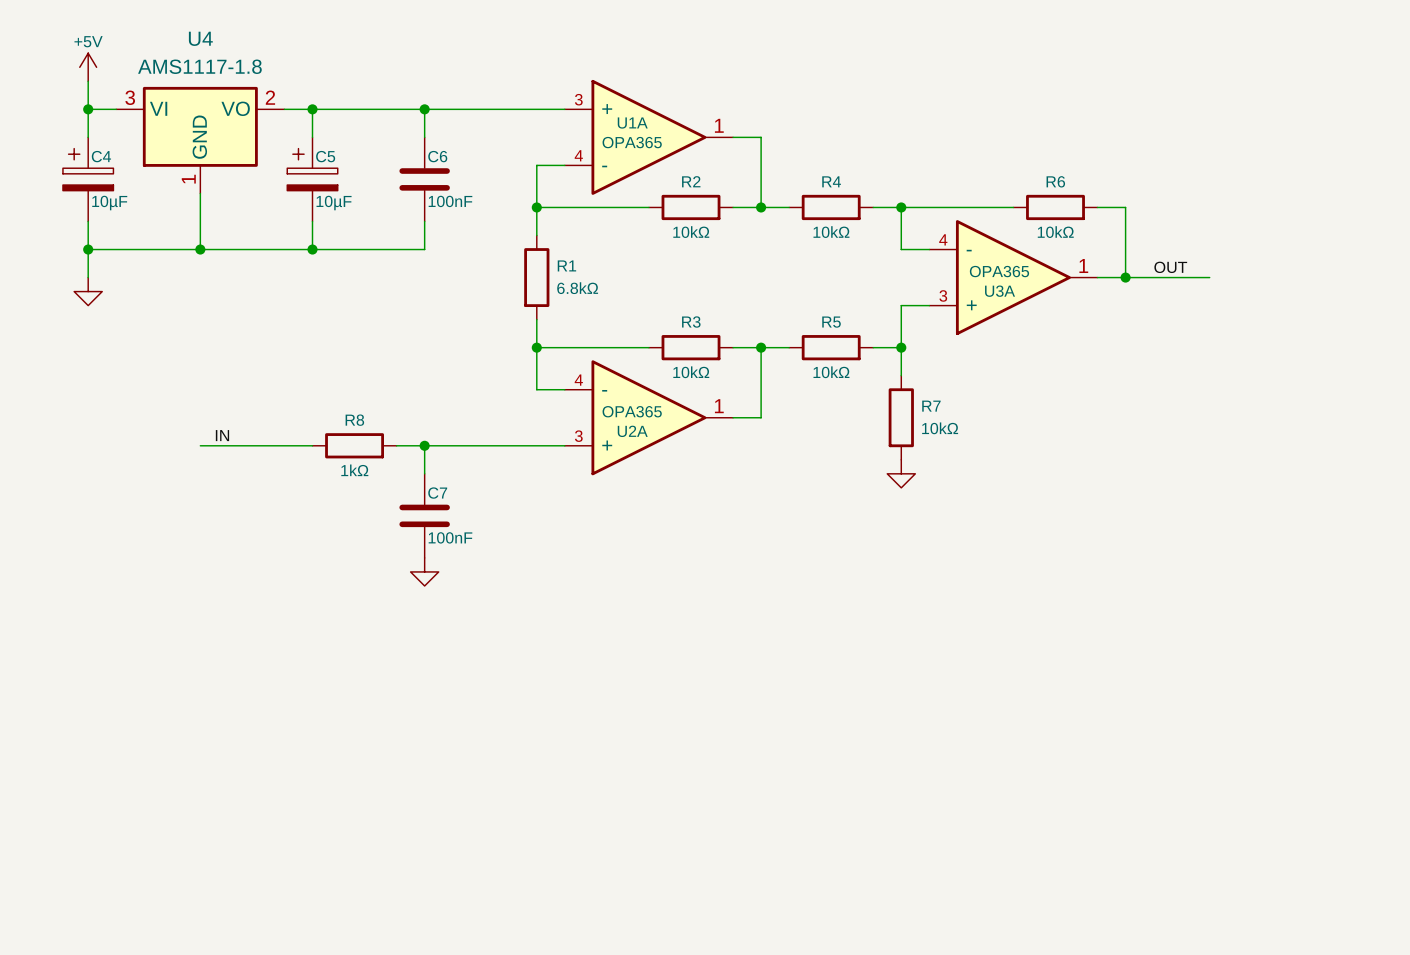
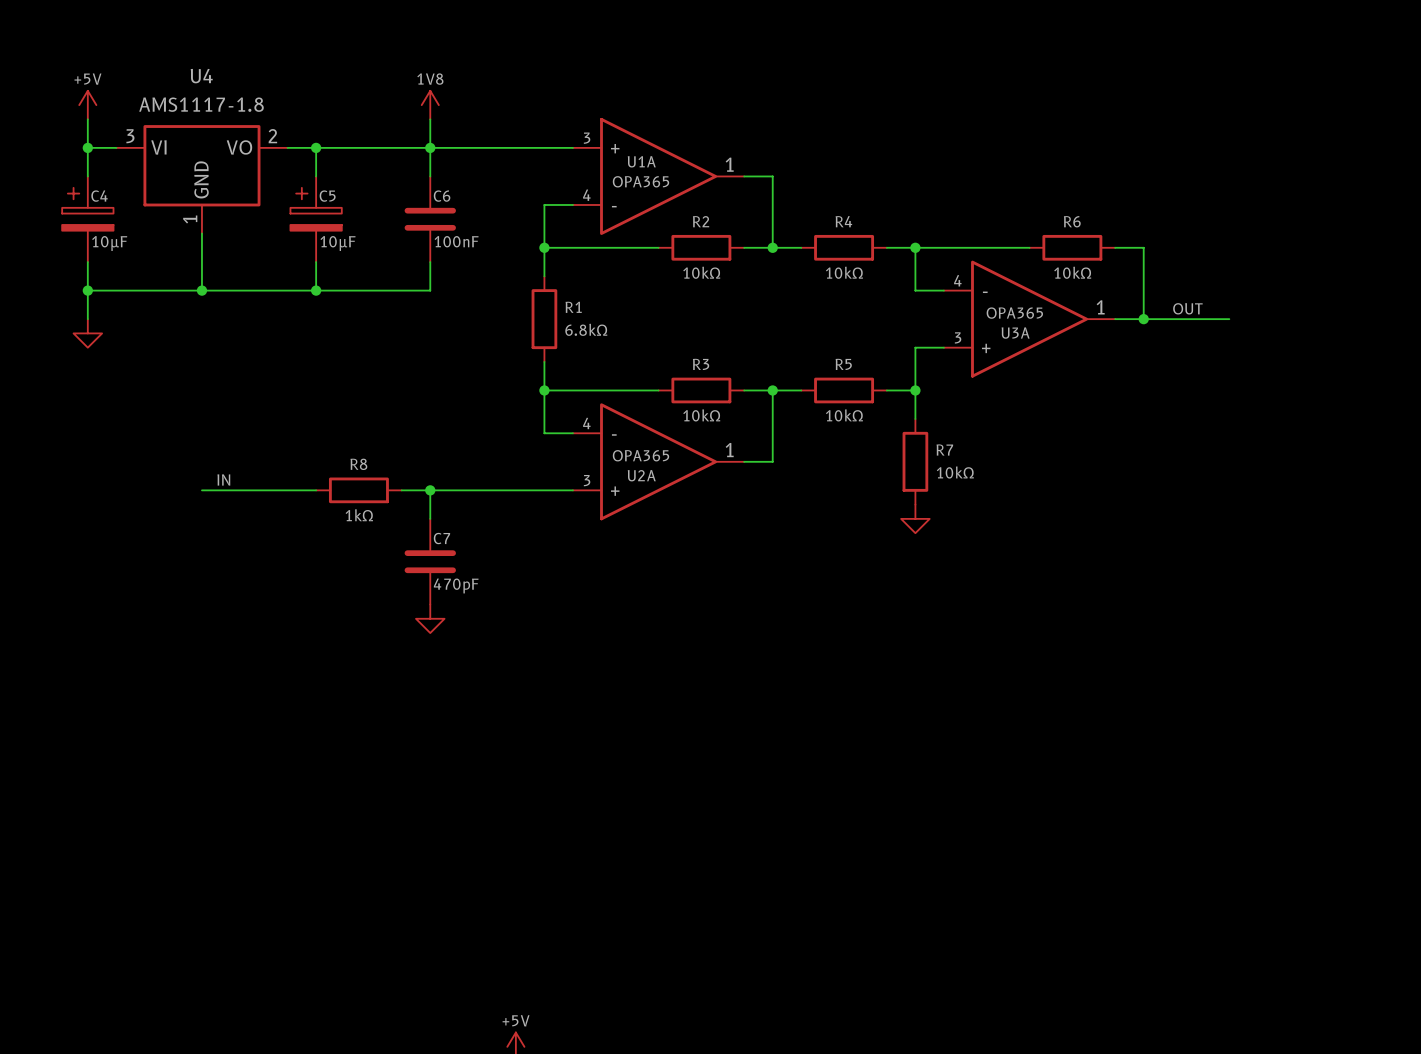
power symbol: none -> 1V8 (430, 105)
wire: none -> (430, 119) (430, 147)
C7 value: 100nF (450, 537) -> 470pF (456, 585)

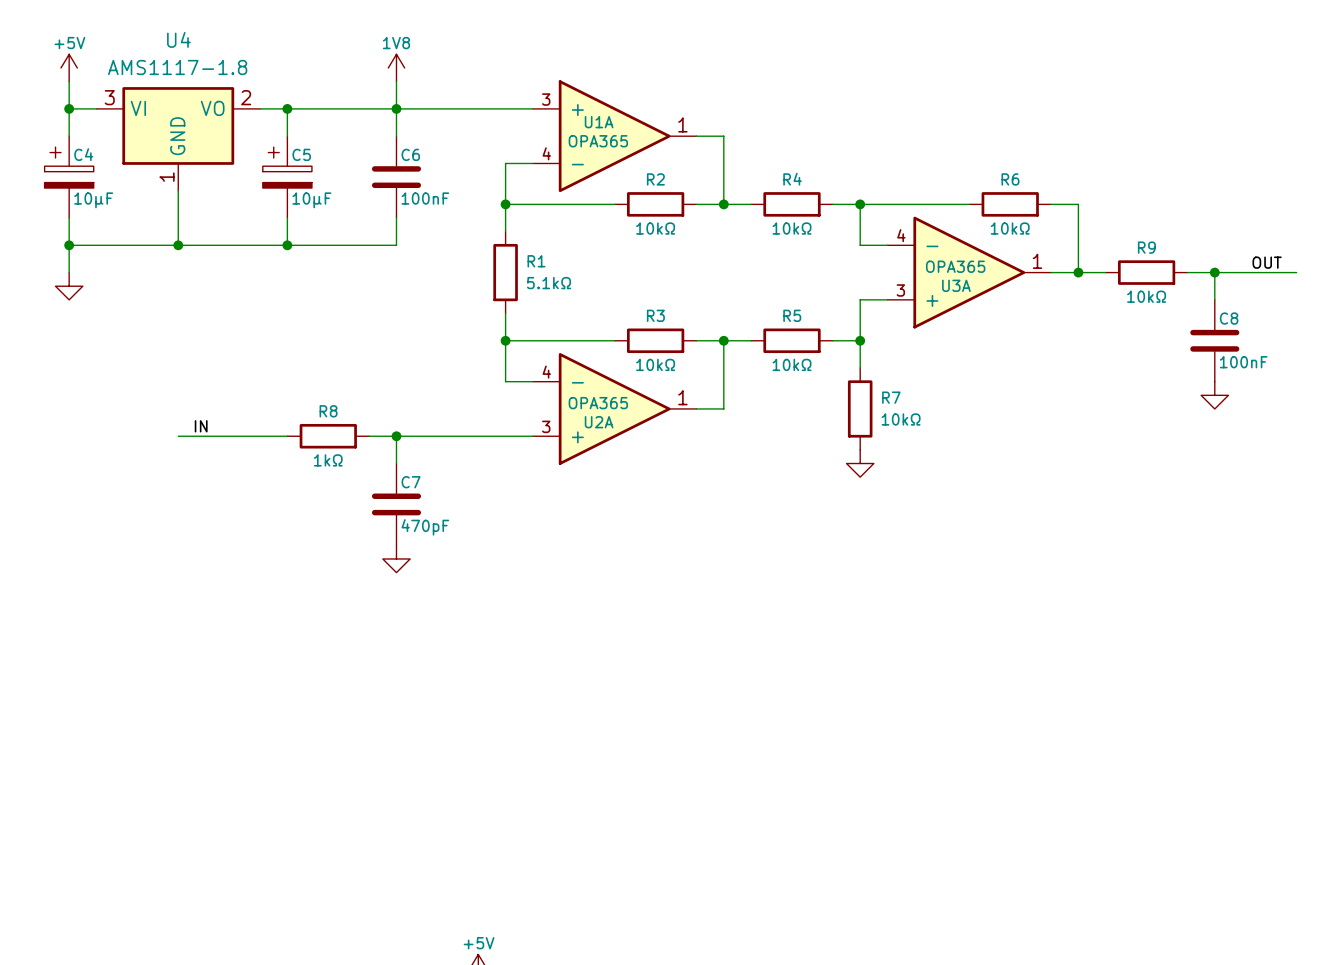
label position: OUT (1187, 308) -> OUT (1267, 262)
wire: (1172, 319) (1229, 319) -> none
R9: none -> 10kΩ (1146, 272)
wire: none -> (1187, 272) (1296, 272)
wire: none -> (1214, 272) (1214, 299)
junction: none -> (1214, 272)
R1 value: 6.8kΩ (586, 329) -> 5.1kΩ (549, 283)
C8: none -> 100nF (1214, 340)
power symbol: none -> (1214, 395)

